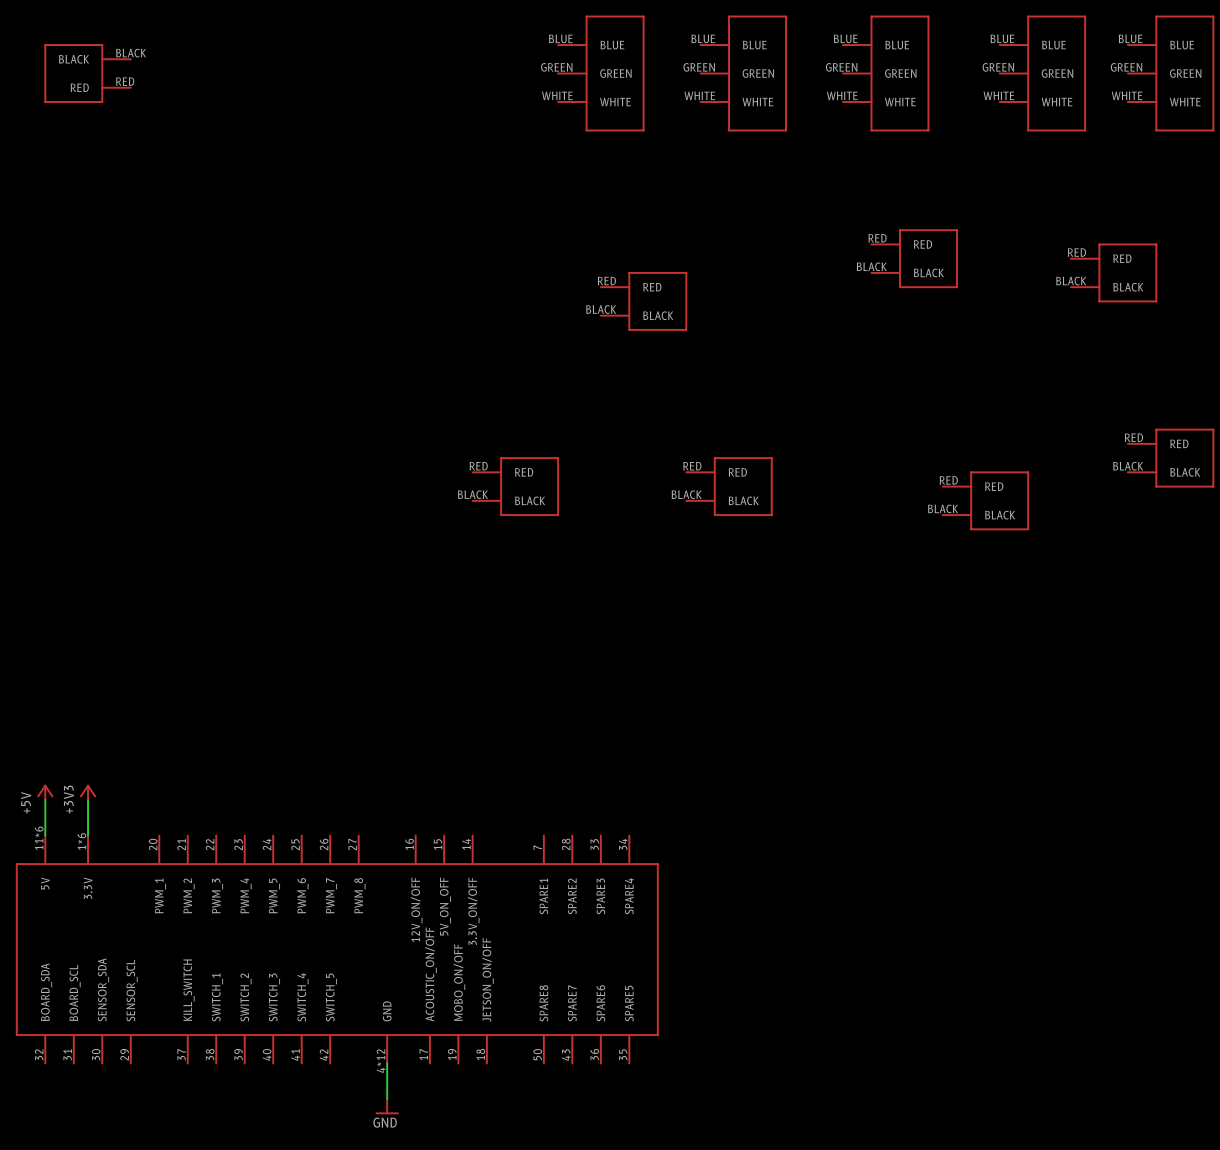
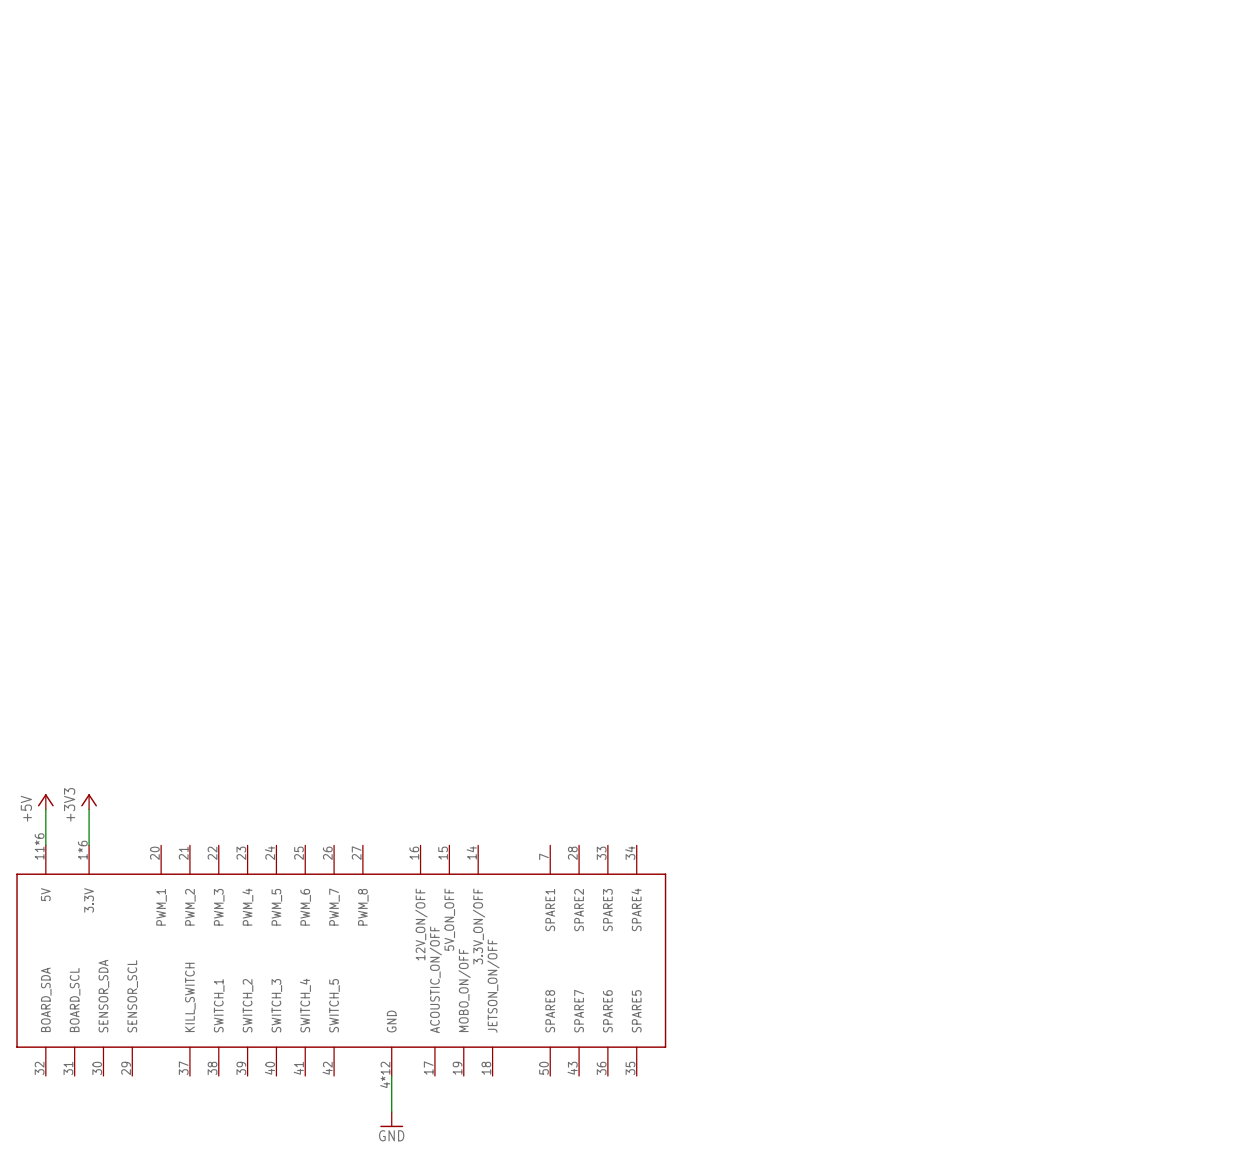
part: (87, 73) -> none
part: (601, 73) -> none
part: (743, 73) -> none
part: (885, 73) -> none
part: (1042, 73) -> none
part: (1170, 73) -> none
part: (914, 258) -> none
part: (1113, 272) -> none
part: (643, 301) -> none
part: (1170, 458) -> none
part: (515, 486) -> none
part: (729, 486) -> none
part: (985, 500) -> none

